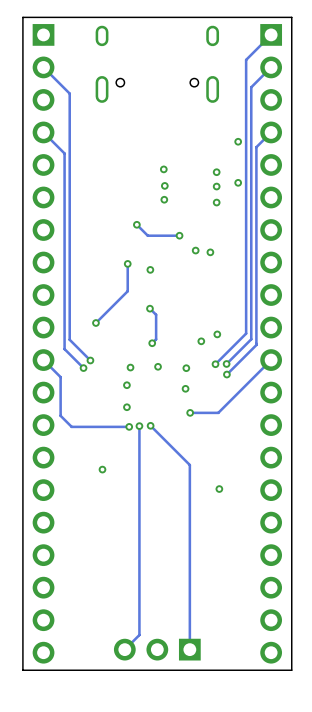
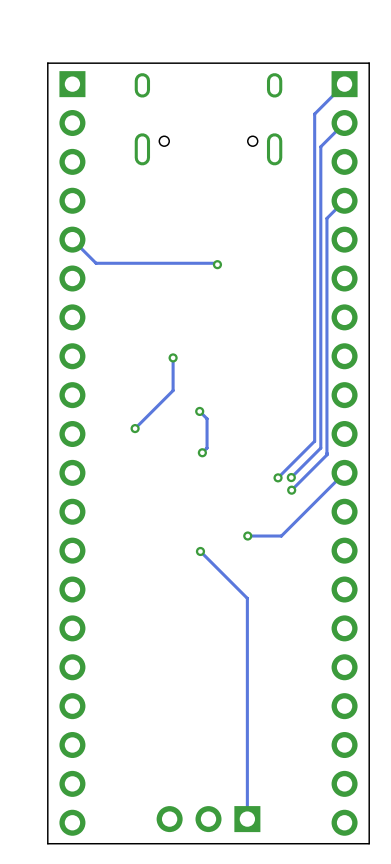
track: (43, 67) (69, 93) (69, 339) (90, 360) -> none
track: (43, 132) (64, 153) (64, 349) (83, 368) -> none
via: (238, 141) -> none
track: none -> (72, 239) (96, 263) (213, 263)
via: (163, 169) -> none
via: (216, 172) -> none
via: (238, 182) -> none
via: (216, 186) -> none
via: (164, 199) -> none
via: (216, 202) -> none
track: (136, 224) (147, 235) (179, 235) -> none
via: (136, 224) -> none
via: (179, 235) -> none
via: (195, 250) -> none
via: (210, 252) -> none
via: (150, 269) -> none
via: (217, 334) -> none
via: (201, 341) -> none
track: (43, 360) (60, 377) (60, 415) (71, 426) (129, 426) -> none
via: (90, 360) -> none
via: (158, 366) -> none
via: (130, 367) -> none
via: (83, 368) -> none
via: (186, 368) -> none
via: (126, 385) -> none
via: (185, 388) -> none
via: (126, 407) -> none
via: (129, 426) -> none
track: (139, 426) (139, 635) (124, 649) -> none
via: (139, 426) -> none
via: (102, 469) -> none
via: (219, 489) -> none

